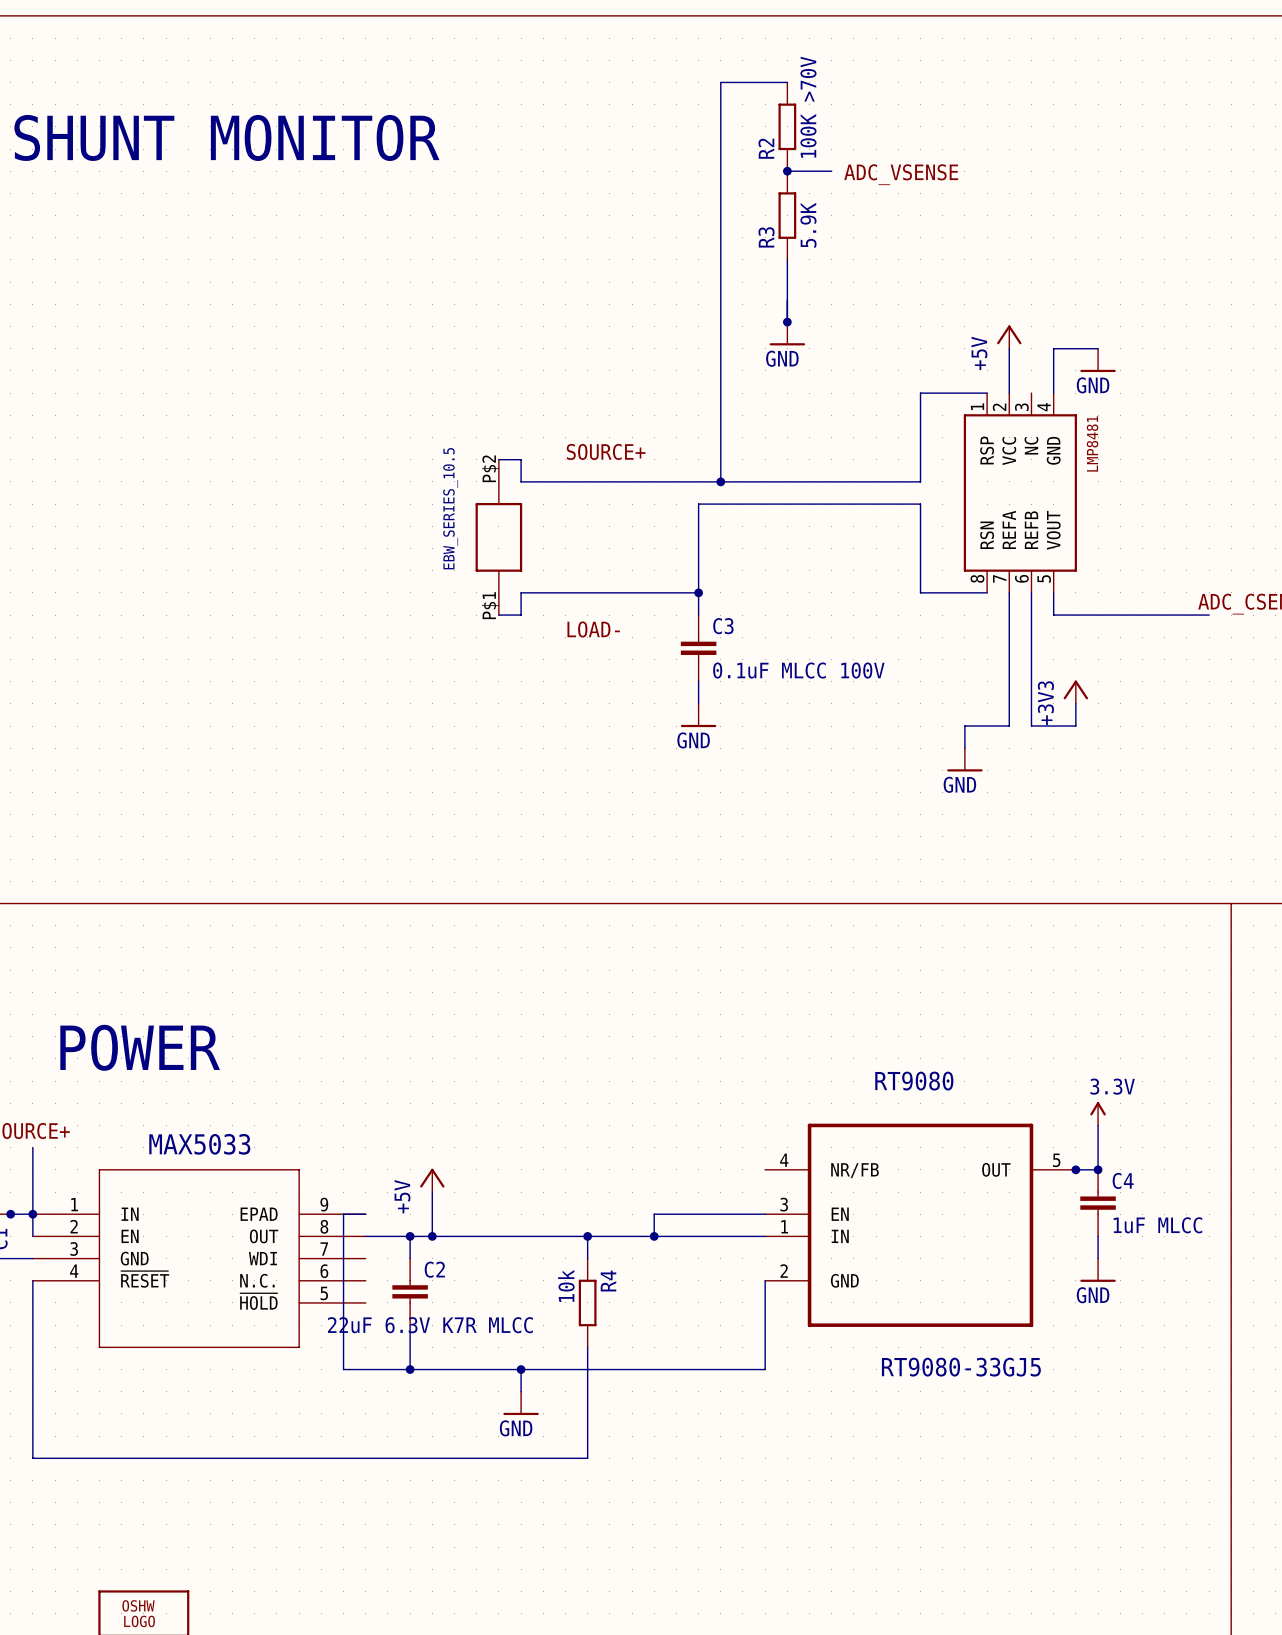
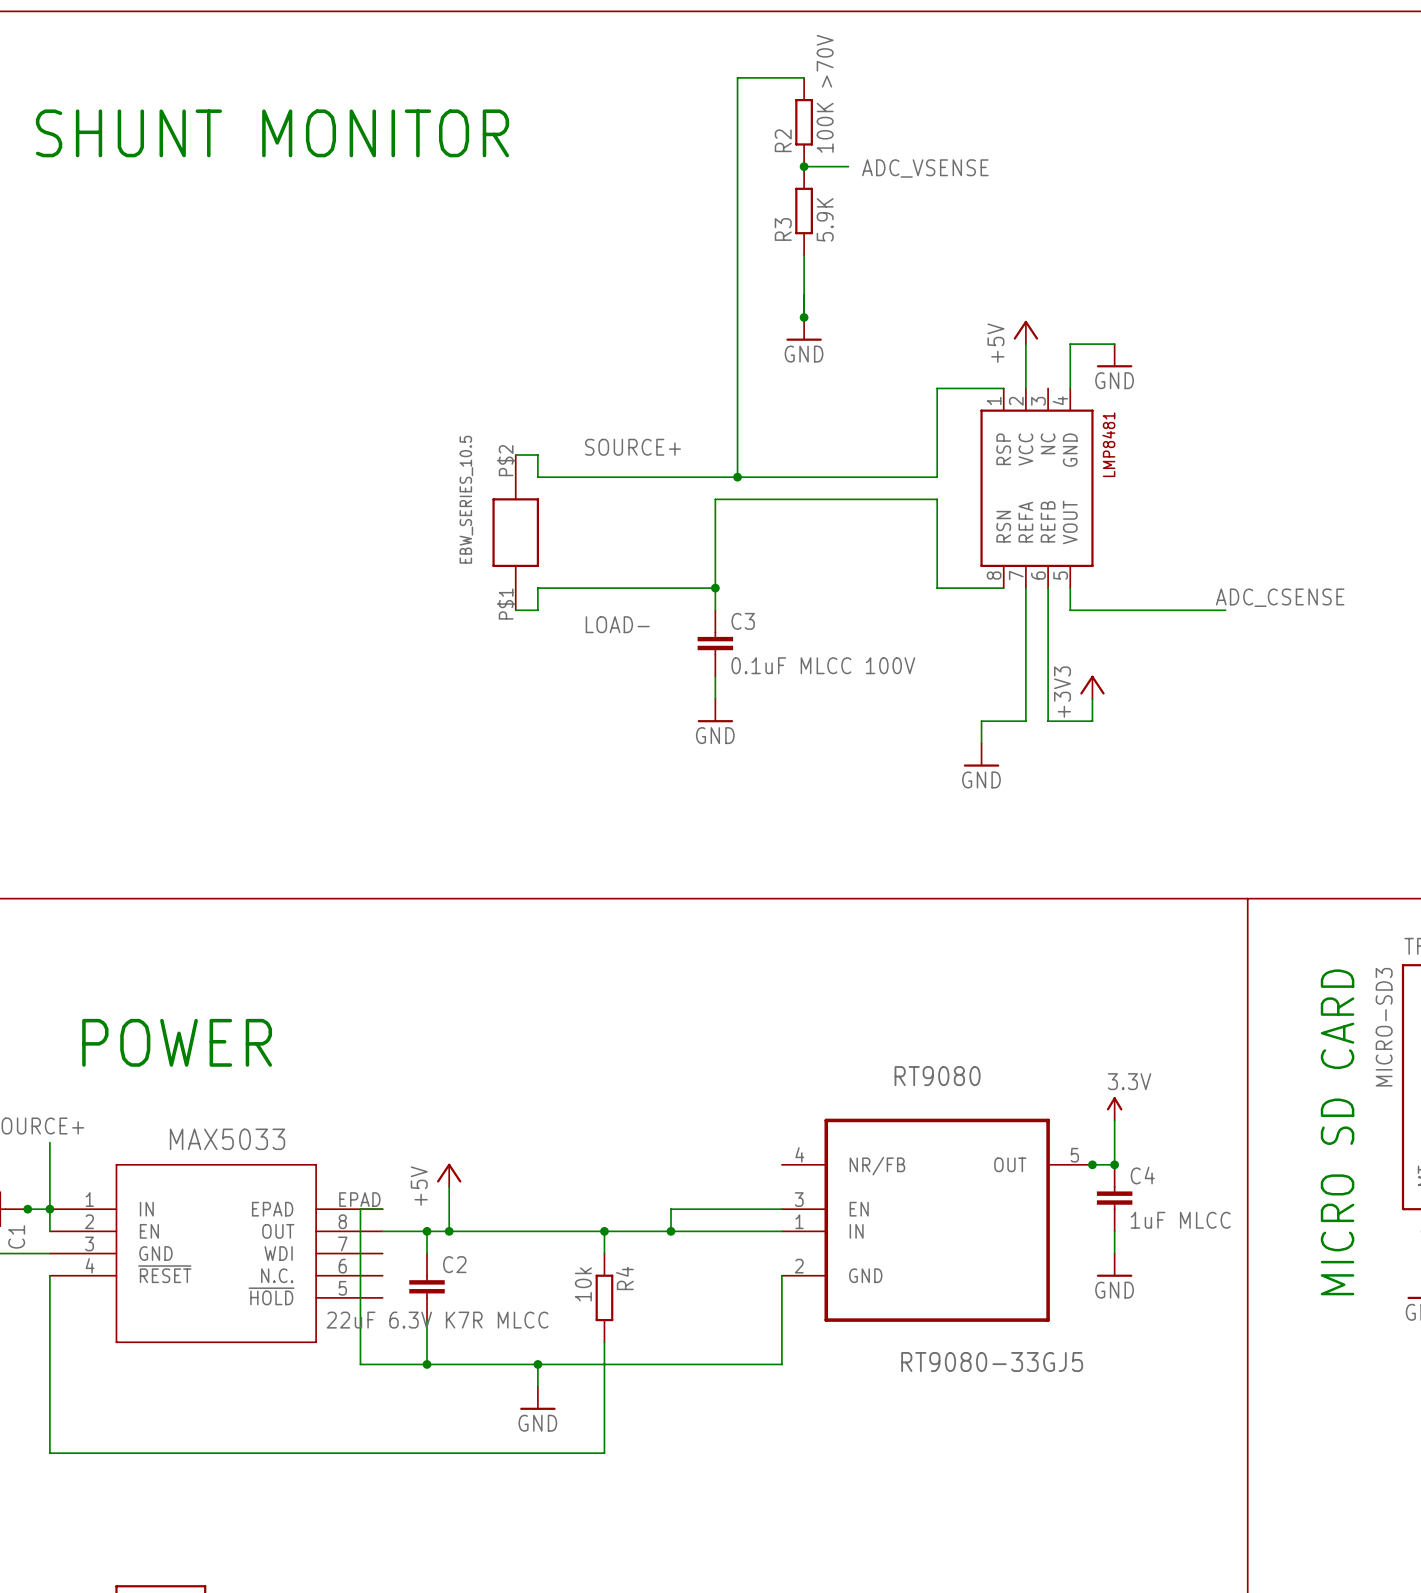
part pin number: 9 (324, 1204) -> EPAD (359, 1199)

